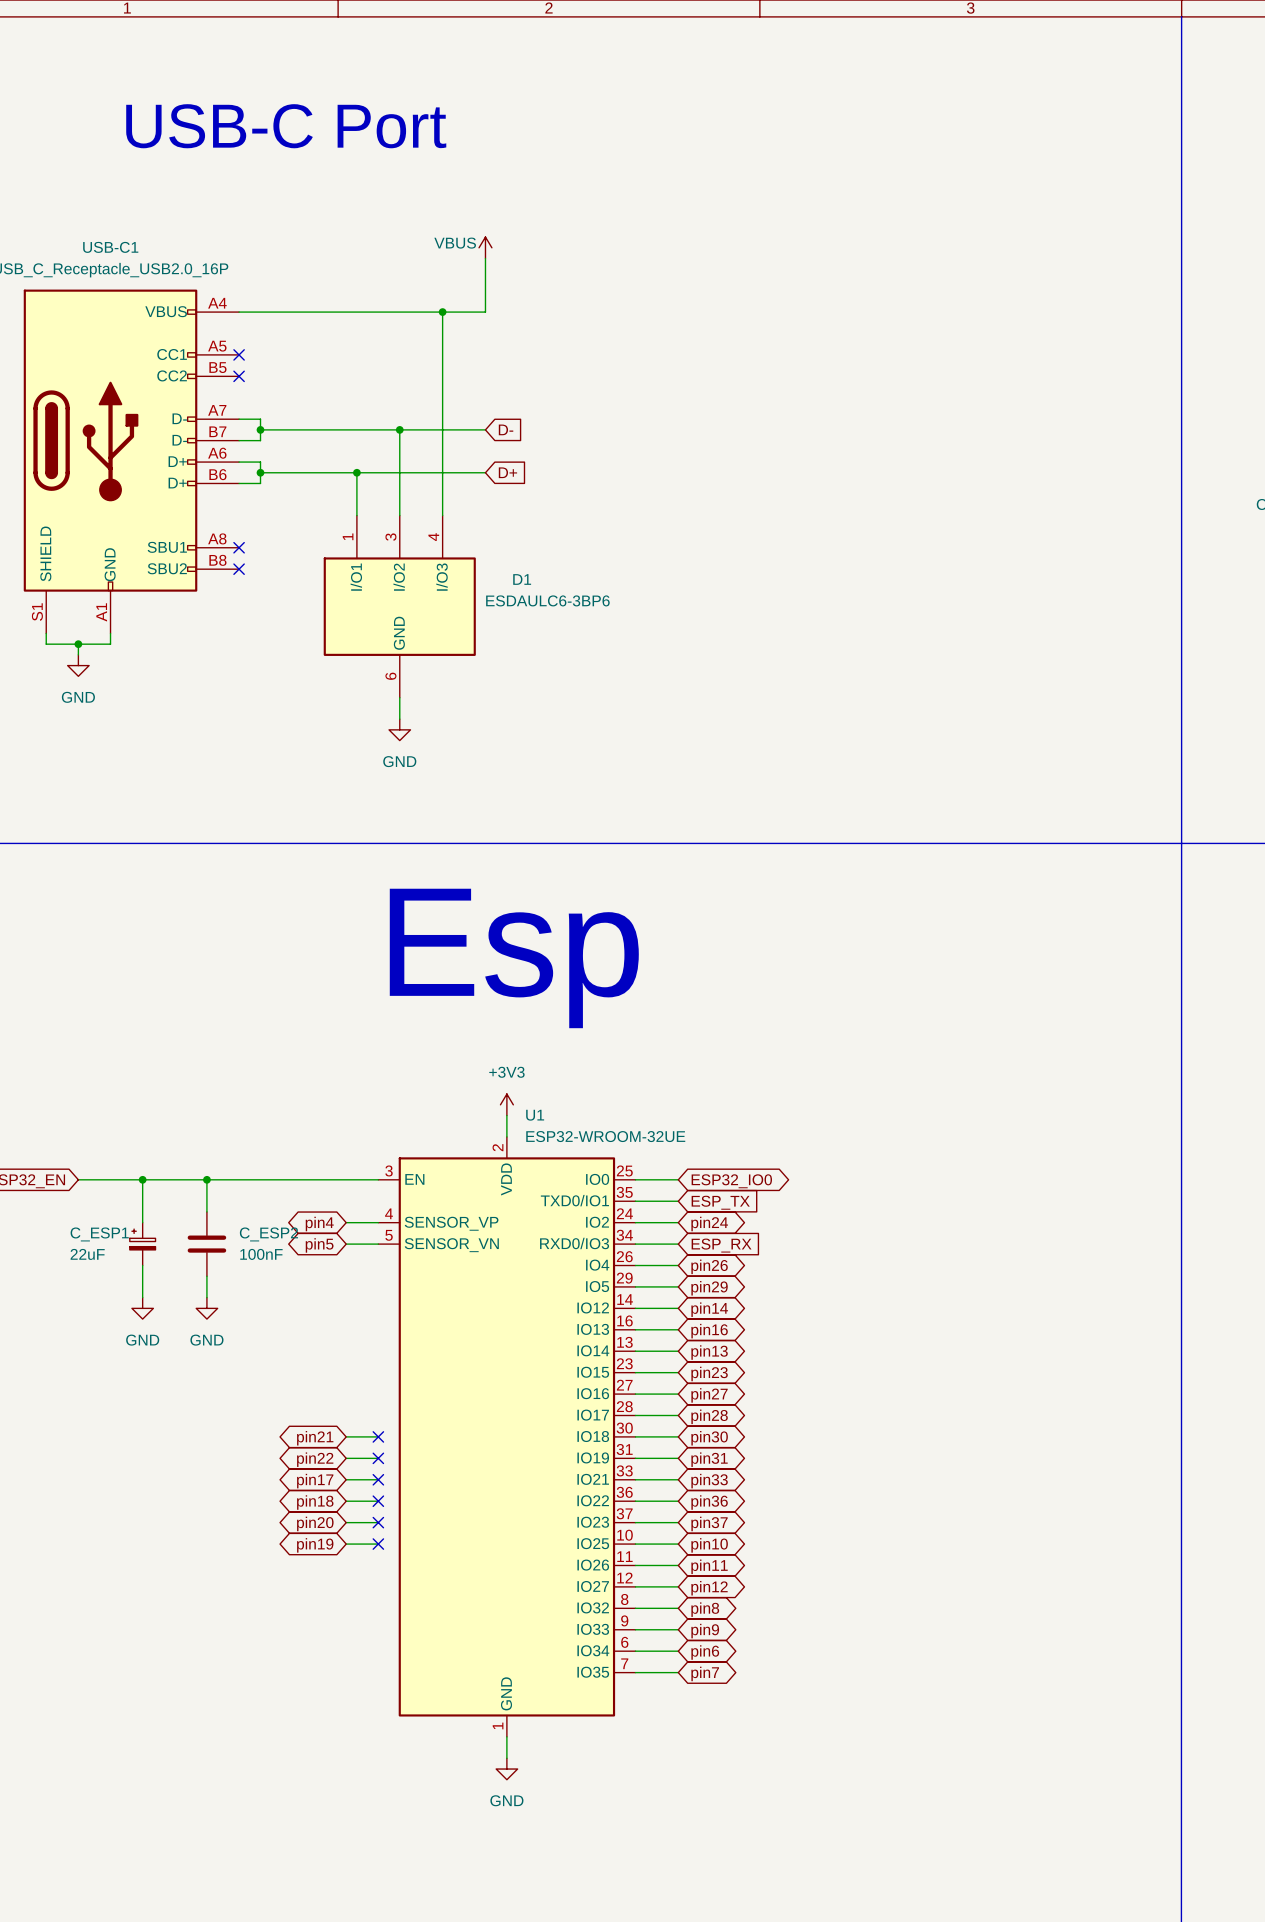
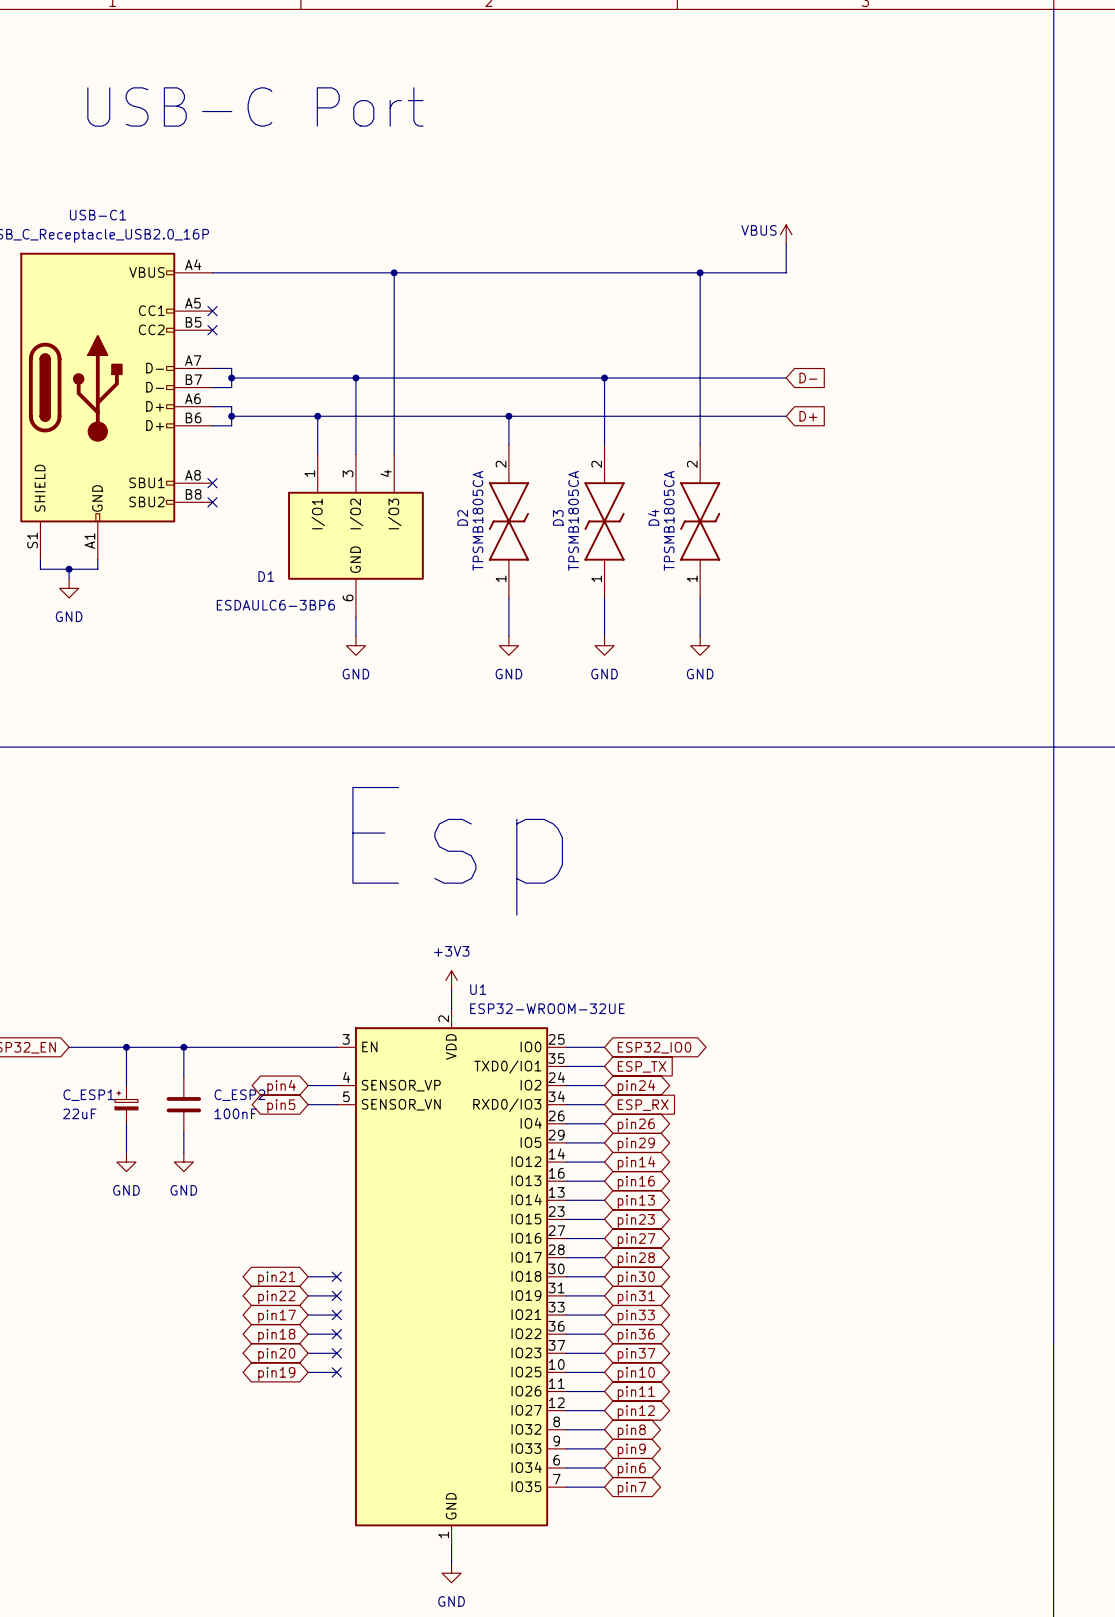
power symbol: VBUS (485, 247) -> none
wire: (485, 258) (485, 312) -> (786, 244) (786, 272) (432, 272)
power symbol: none -> VBUS (786, 234)
wire: none -> (700, 272) (700, 444)
junction: none -> (700, 272)
wire: none -> (432, 378) (786, 378)
global label: D- (506, 429) -> none
wire: none -> (604, 378) (604, 444)
junction: none -> (604, 378)
global label: none -> D- (808, 378)
wire: none -> (432, 416) (786, 416)
global label: D+ (507, 472) -> none
wire: none -> (508, 416) (508, 444)
junction: none -> (508, 416)
global label: none -> D+ (808, 416)
D1 name position: D1 (522, 579) -> D1 (266, 576)
D2: none -> TPSMB1805CA (508, 521)
D3: none -> TPSMB1805CA (604, 521)
D4: none -> TPSMB1805CA (700, 521)
D1 value position: ESDAULC6-3BP6 (547, 600) -> ESDAULC6-3BP6 (275, 605)
wire: none -> (508, 597) (508, 636)
wire: none -> (604, 597) (604, 636)
wire: none -> (700, 597) (700, 636)
power symbol: none -> GND (508, 645)
power symbol: none -> GND (604, 645)
power symbol: none -> GND (700, 645)

